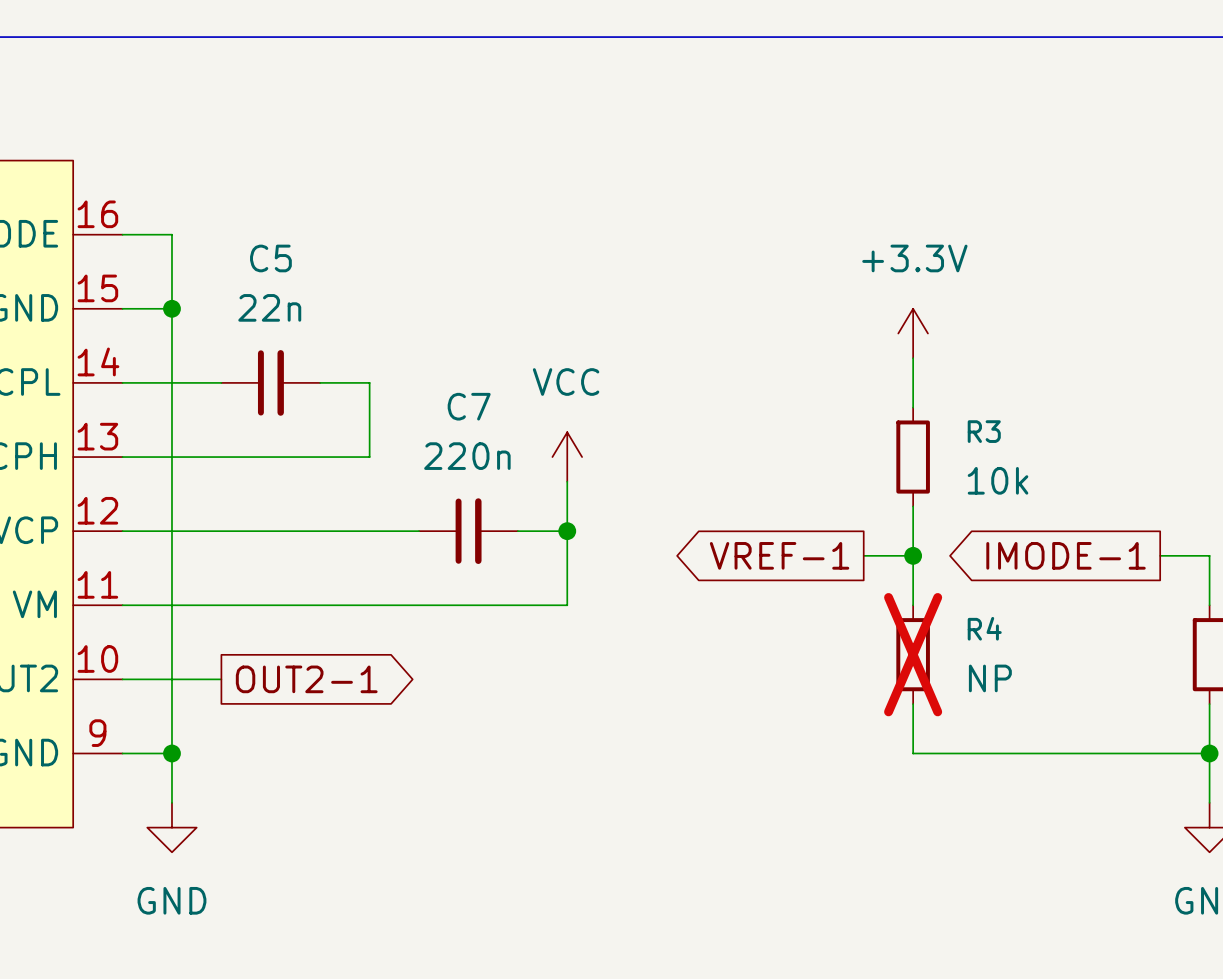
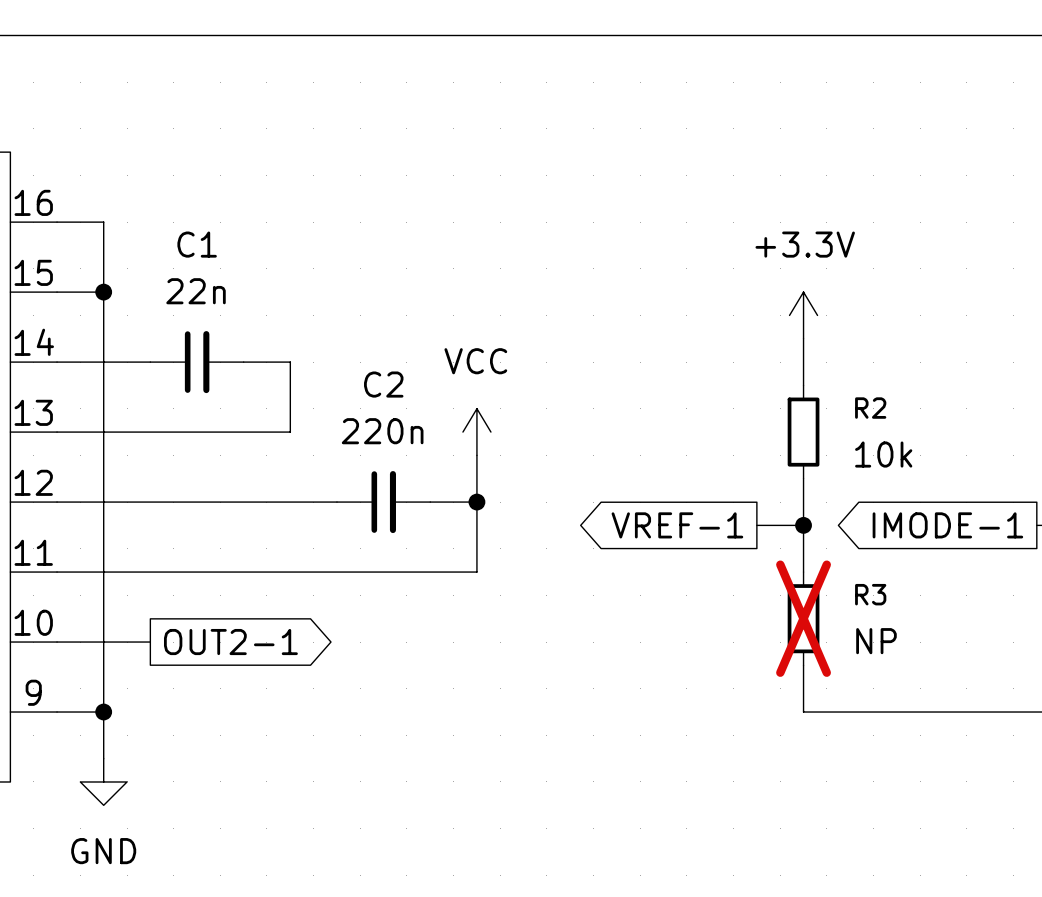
C5 name: C5 (270, 258) -> C1 (197, 244)
C7 name: C7 (469, 406) -> C2 (383, 384)
R3 name: R3 (984, 431) -> R2 (870, 408)
R4 name: R4 (984, 628) -> R3 (870, 594)

